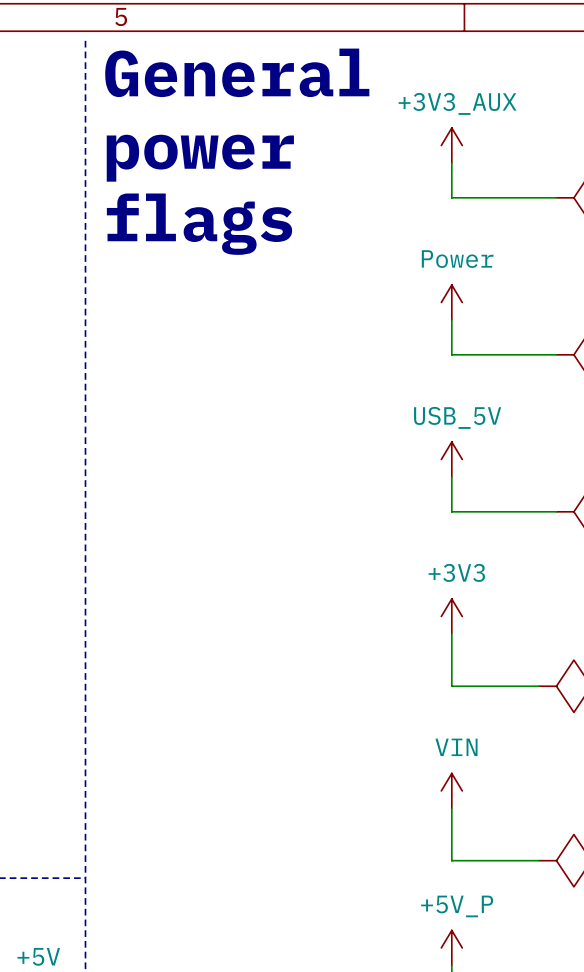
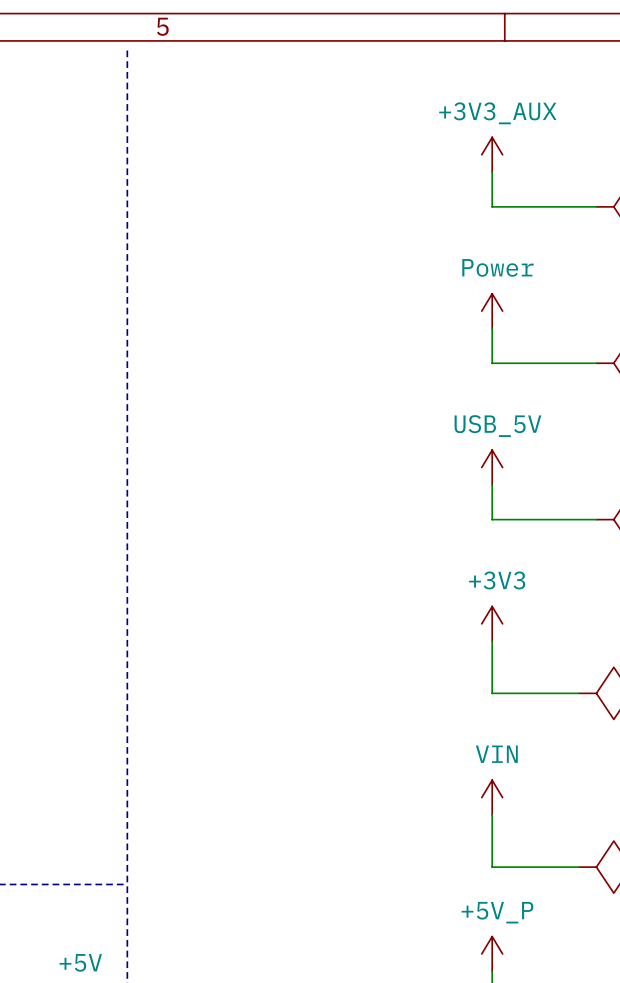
text: General (237, 72) -> none
text: power (200, 158) -> none
text: flags (199, 224) -> none

